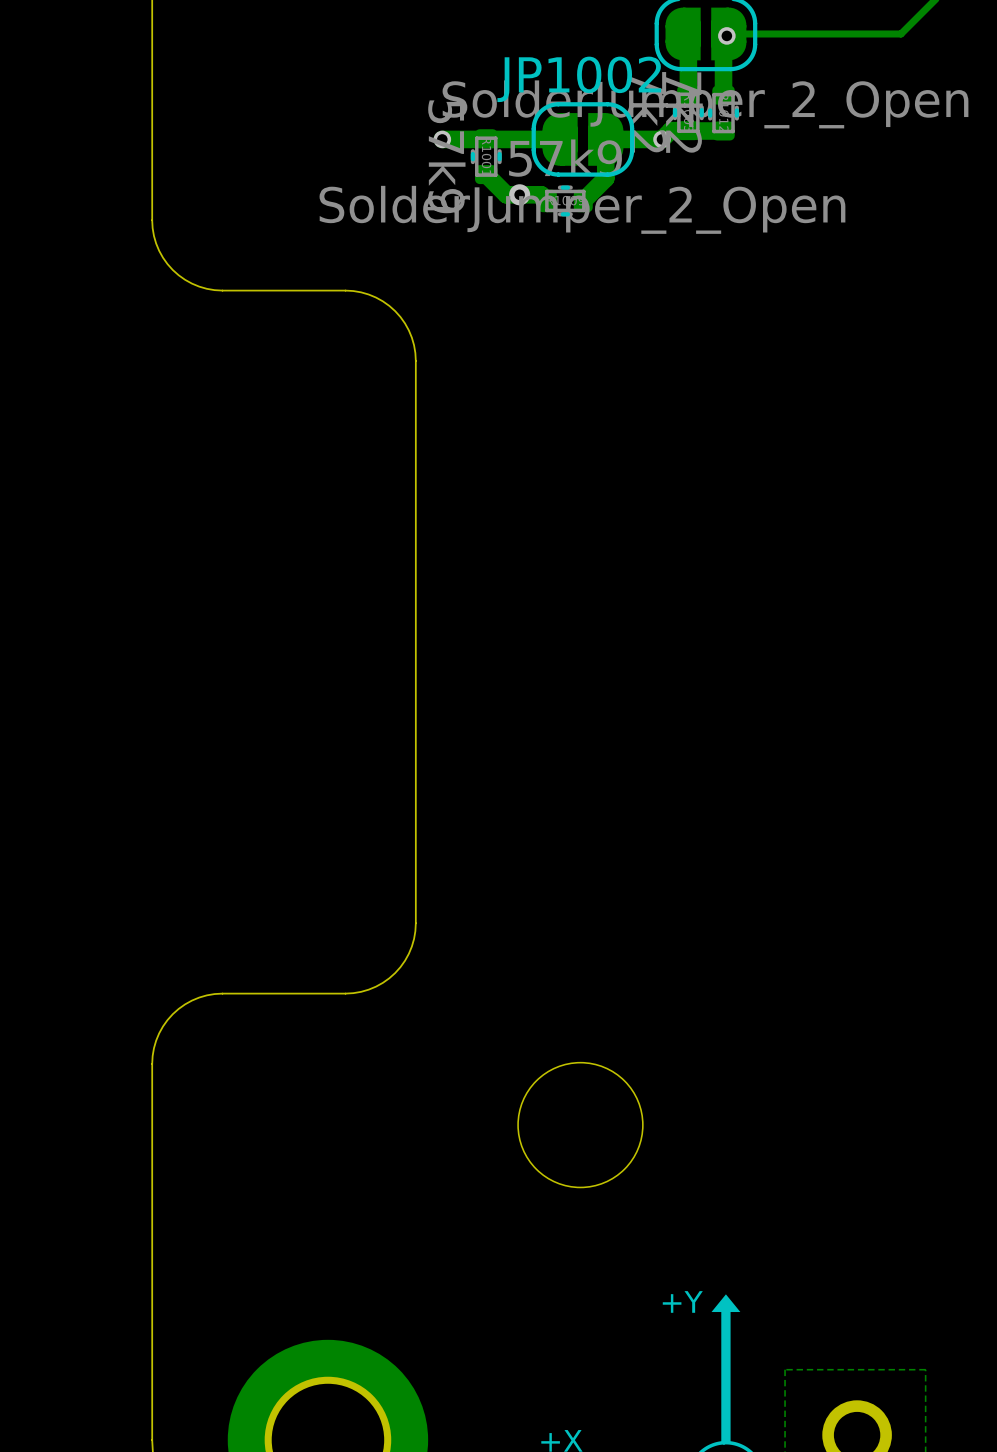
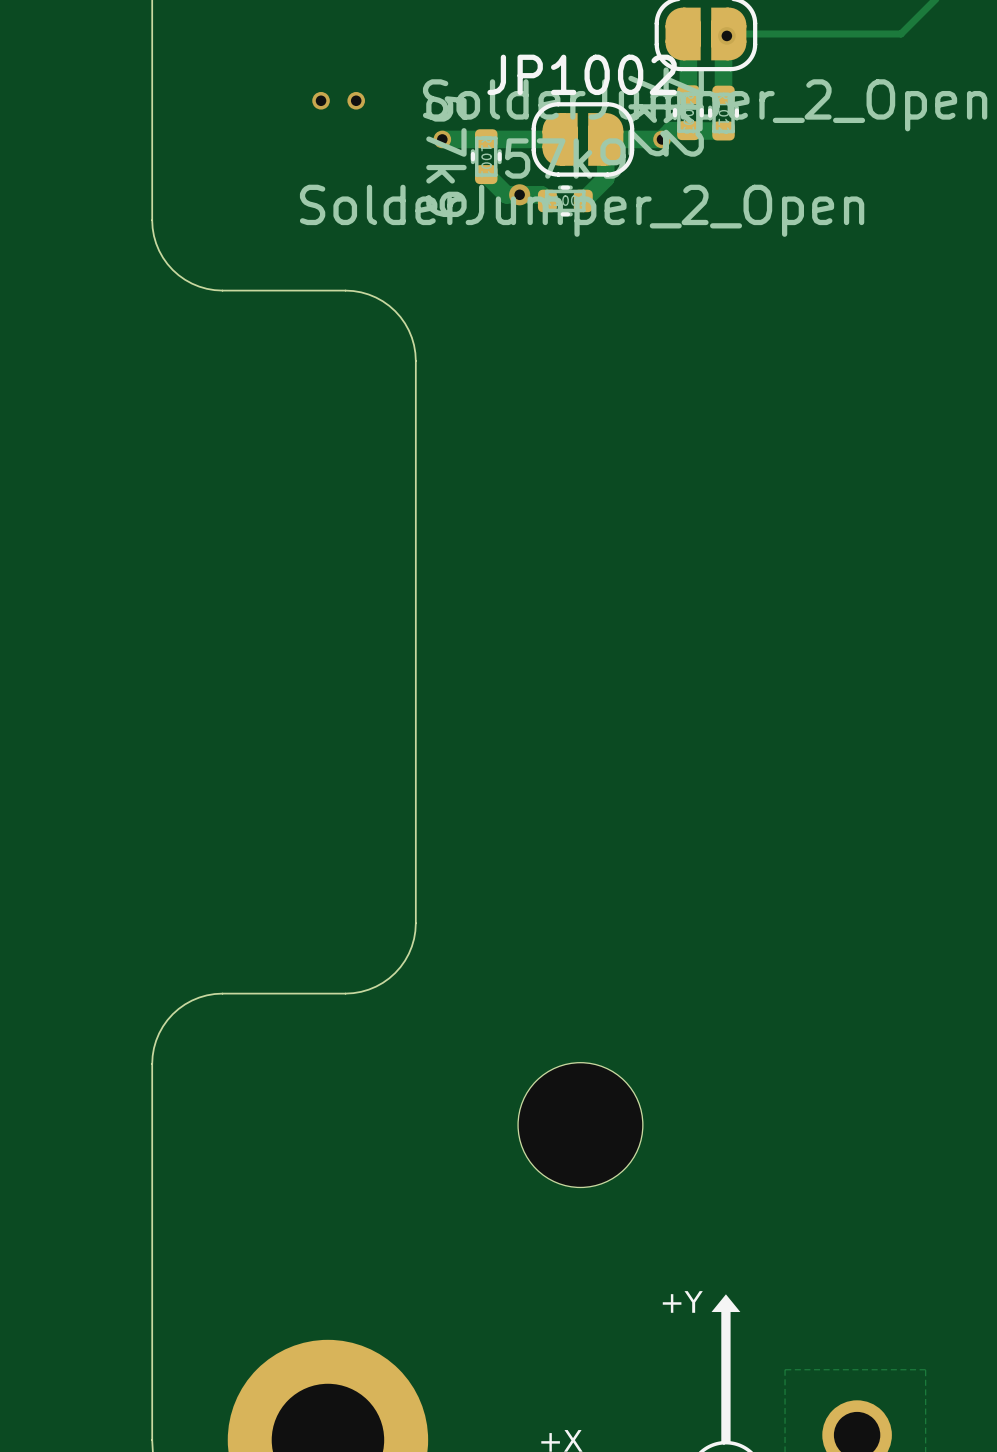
via: none -> (321, 100)
via: none -> (356, 100)

